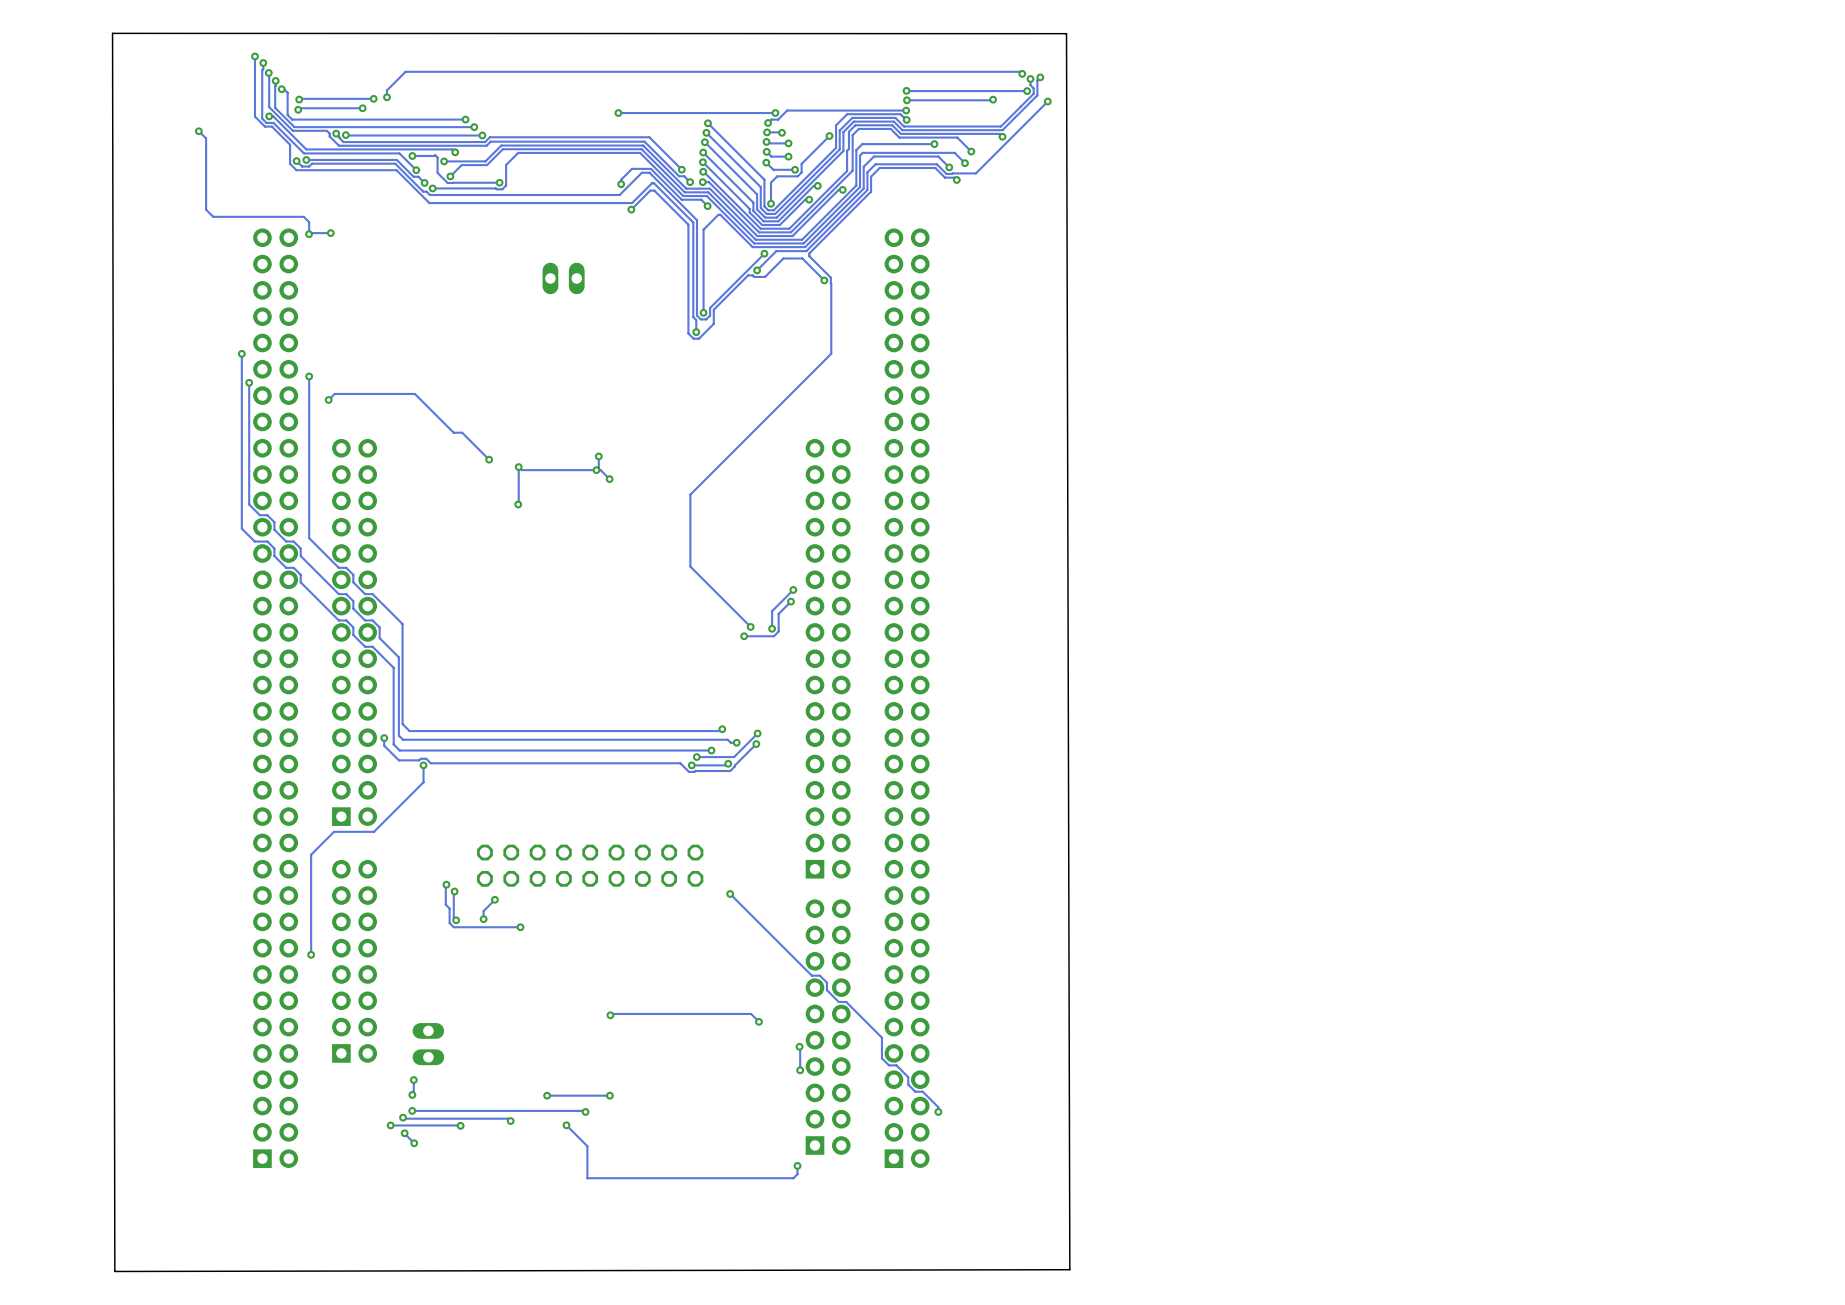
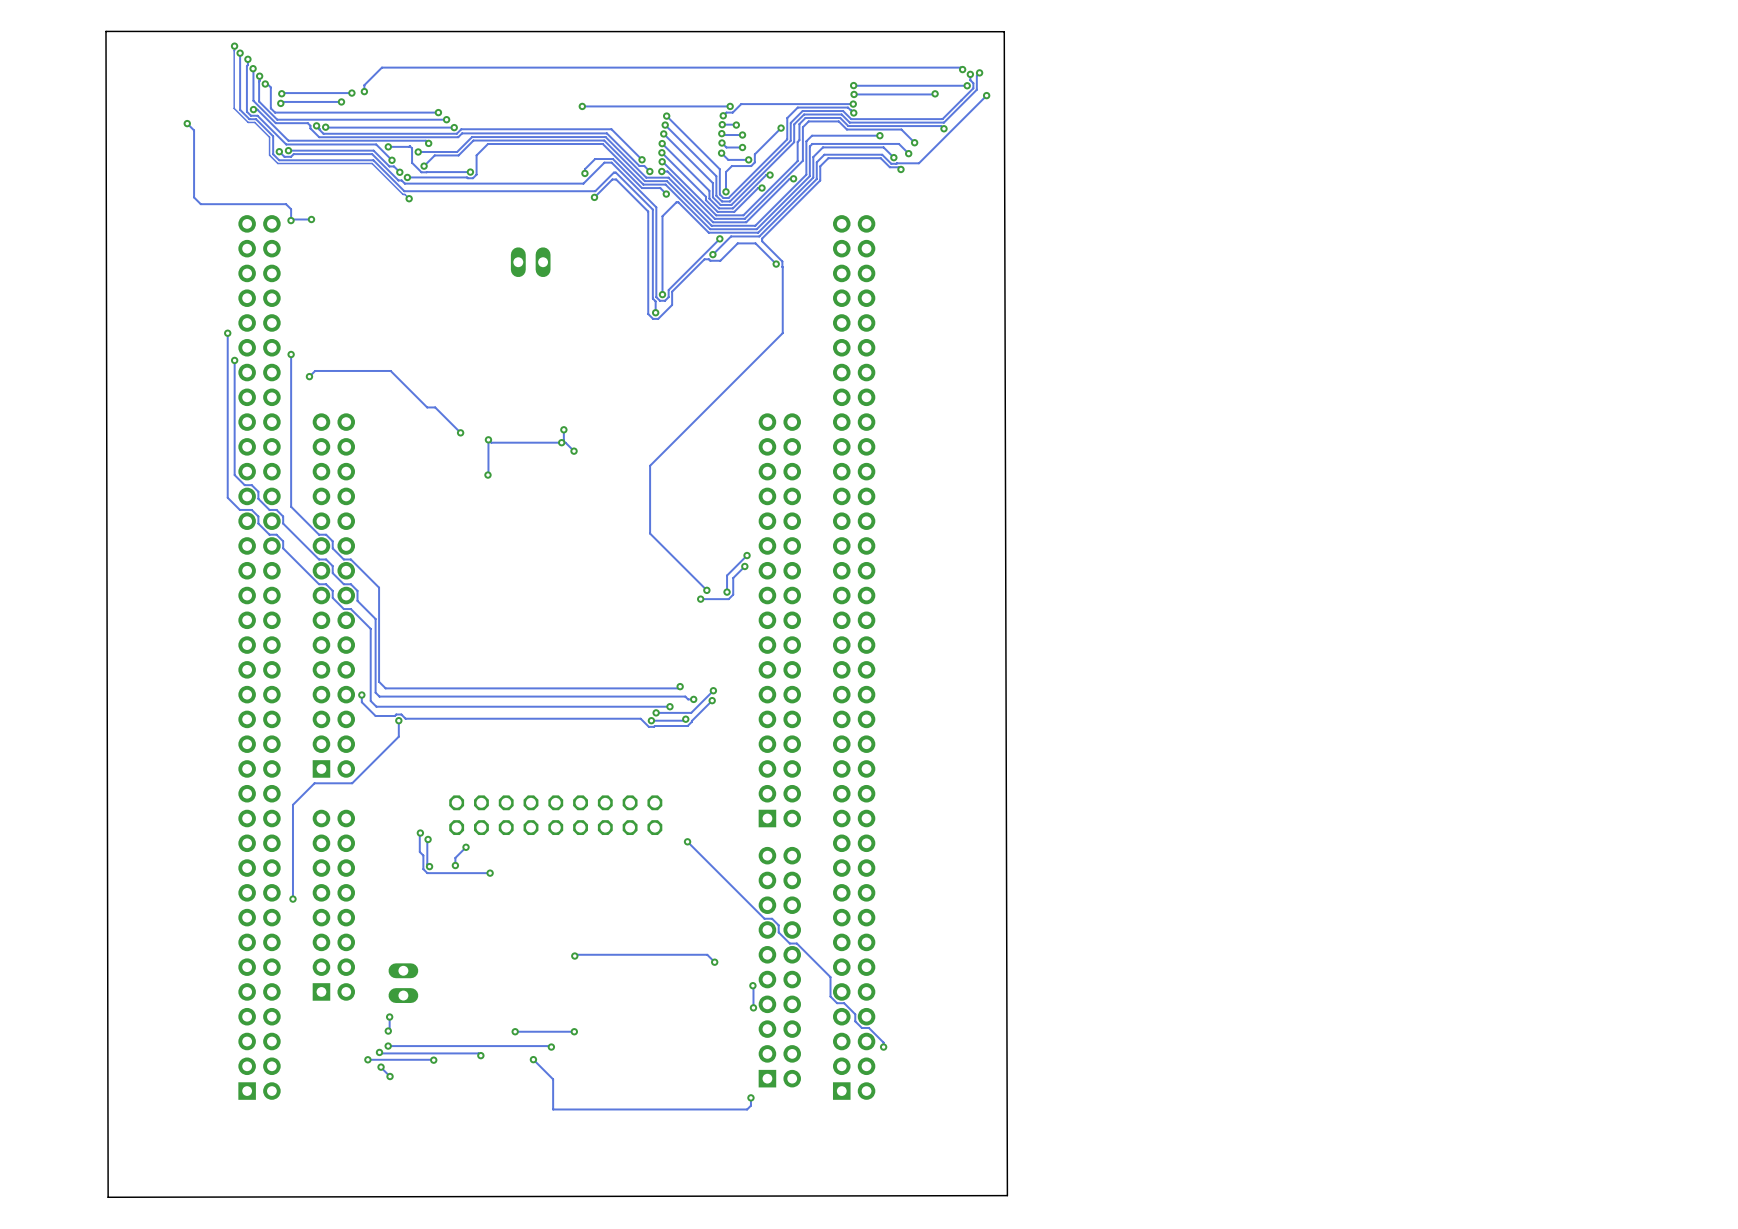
track: none -> (234, 46) (234, 108) (248, 122) (254, 122) (269, 137) (269, 155) (277, 163) (372, 163) (409, 198)
via: none -> (234, 46)
via: none -> (409, 198)

